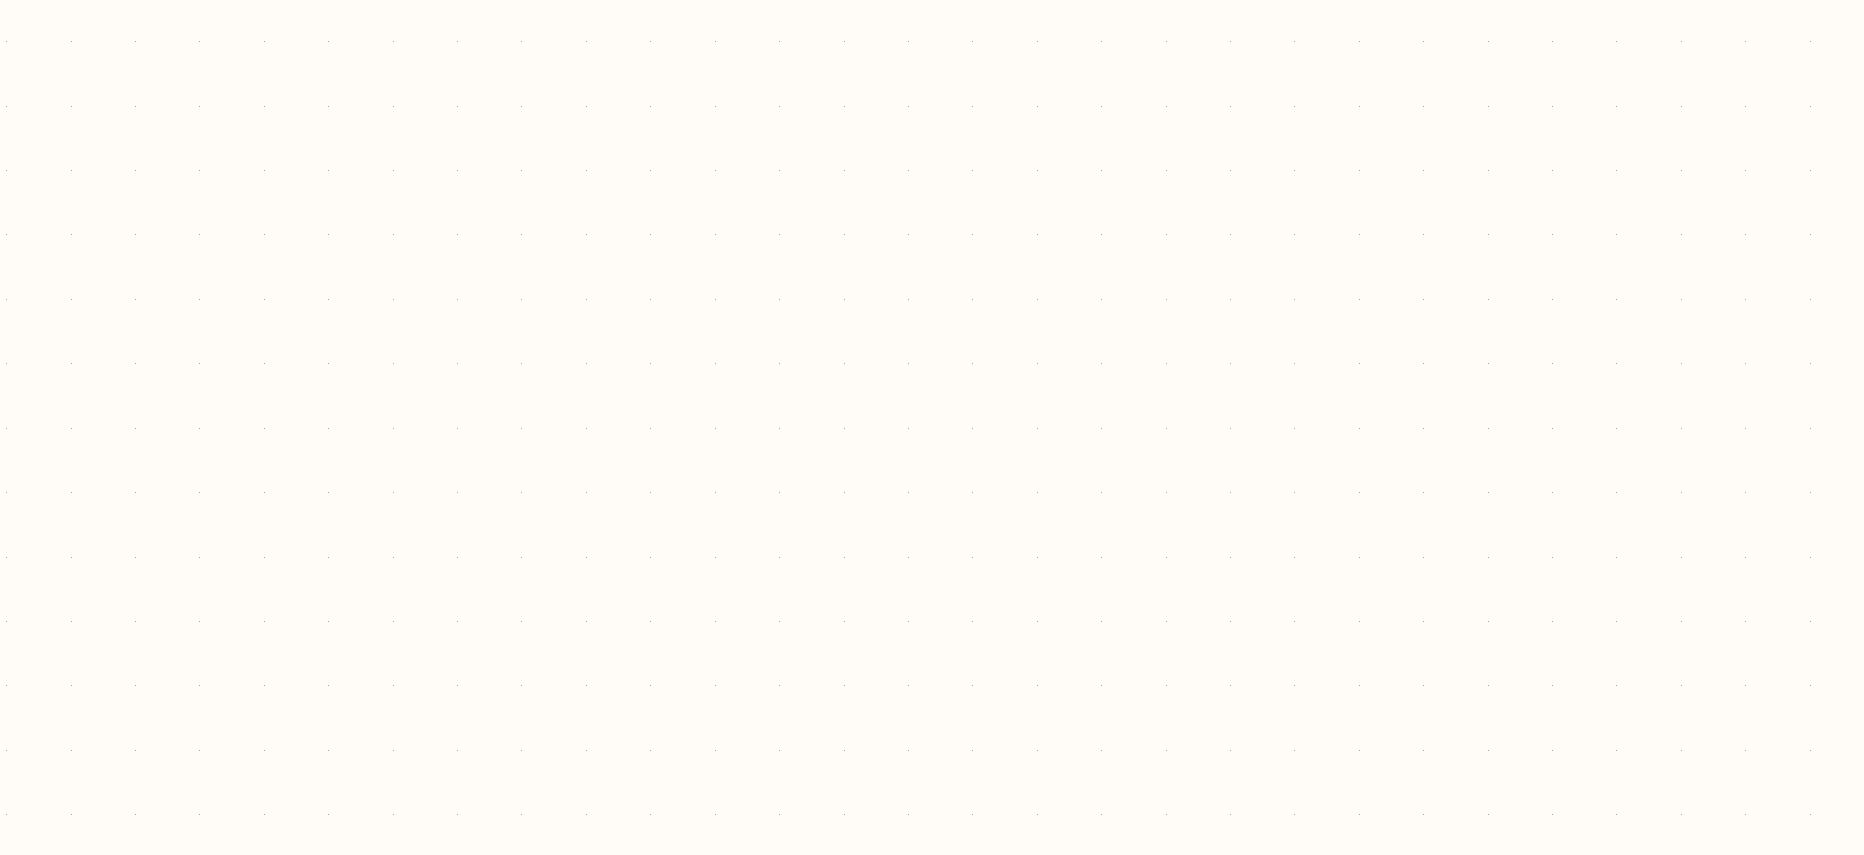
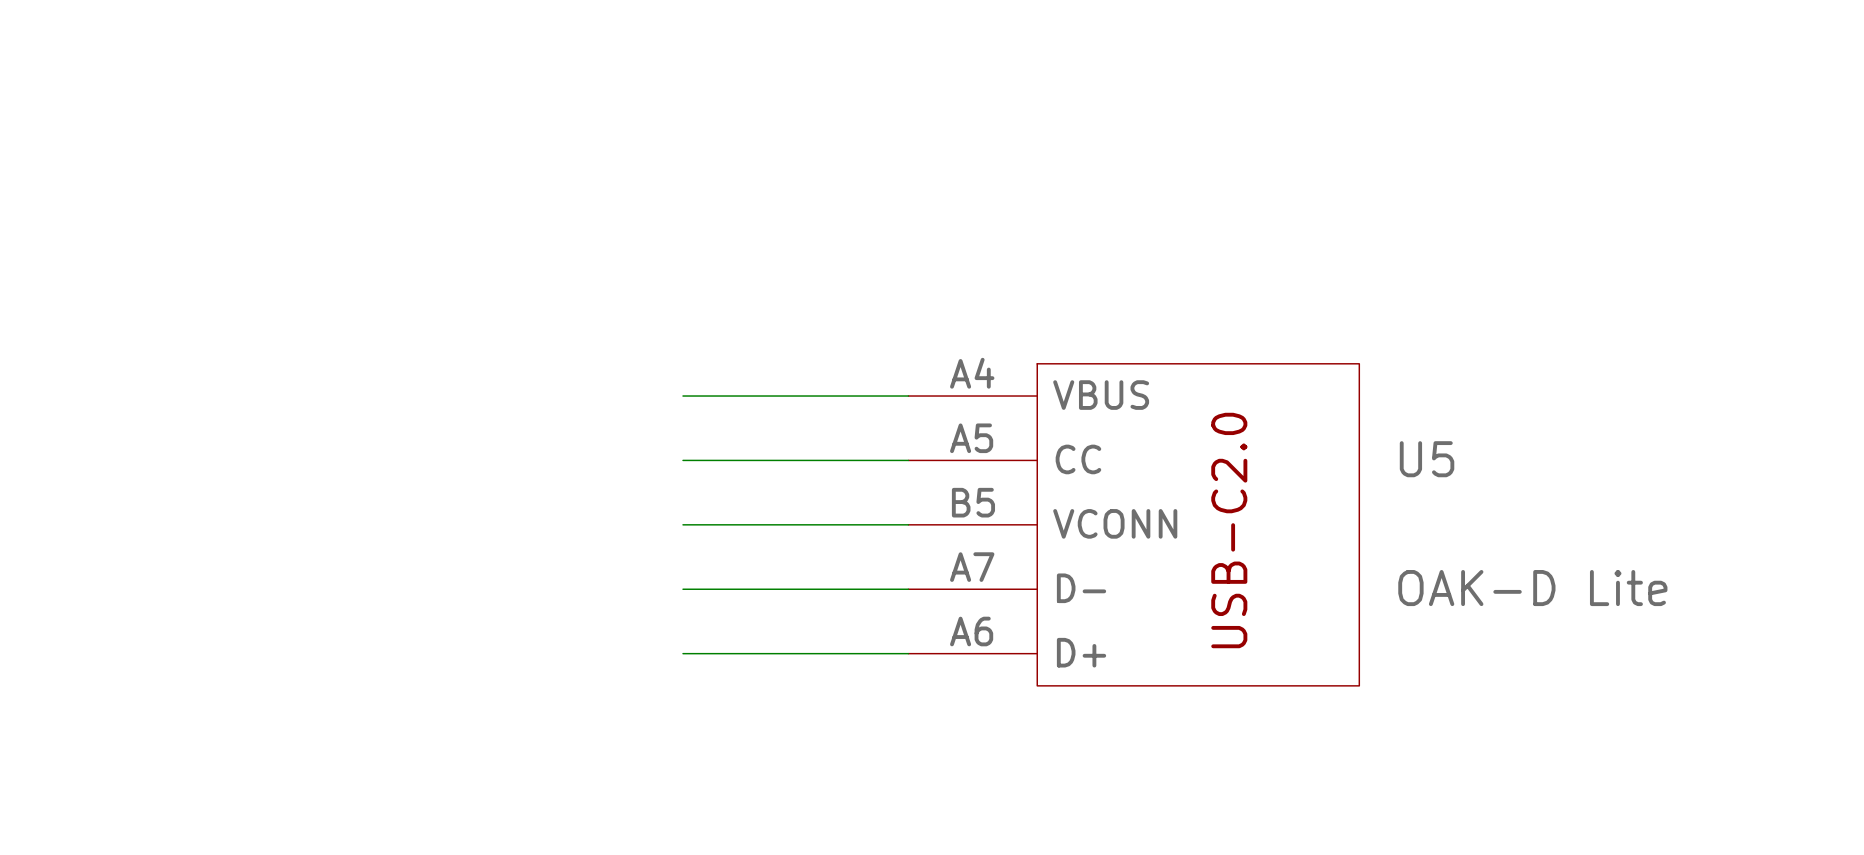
wire: none -> (682, 396) (908, 396)
wire: none -> (682, 460) (908, 460)
wire: none -> (682, 524) (908, 524)
U5: none -> (1133, 524)
wire: none -> (682, 589) (908, 589)
wire: none -> (682, 653) (908, 653)

